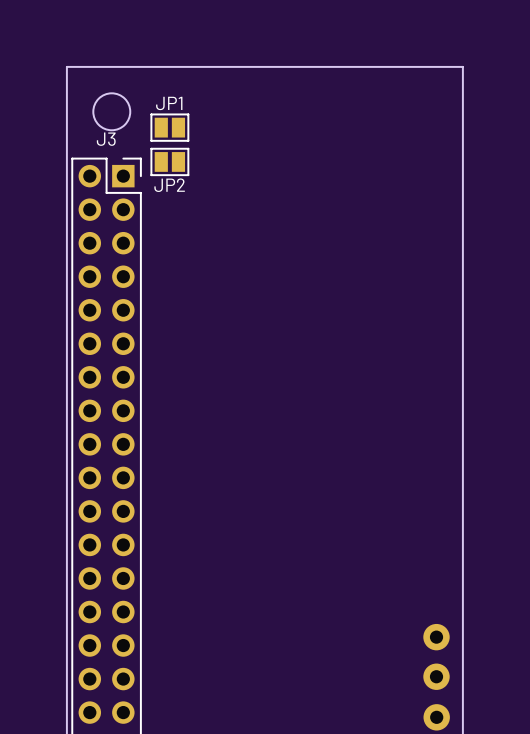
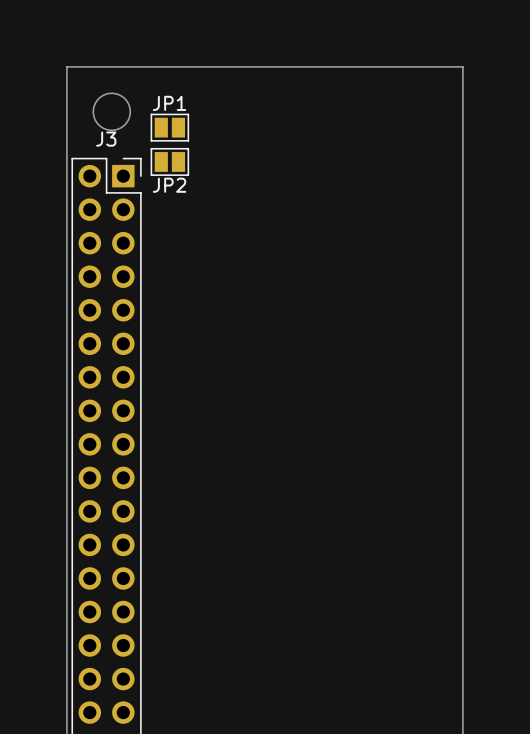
part: (436, 637) -> none
part: (436, 676) -> none
part: (436, 717) -> none

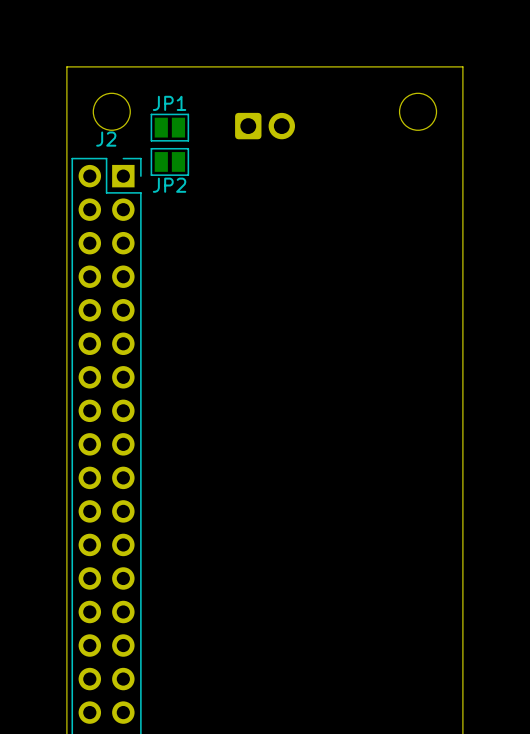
round board edge: none -> [399, 92, 437, 131]
part: none -> (265, 126)
J3 name: J3 (106, 139) -> J2 (106, 139)

